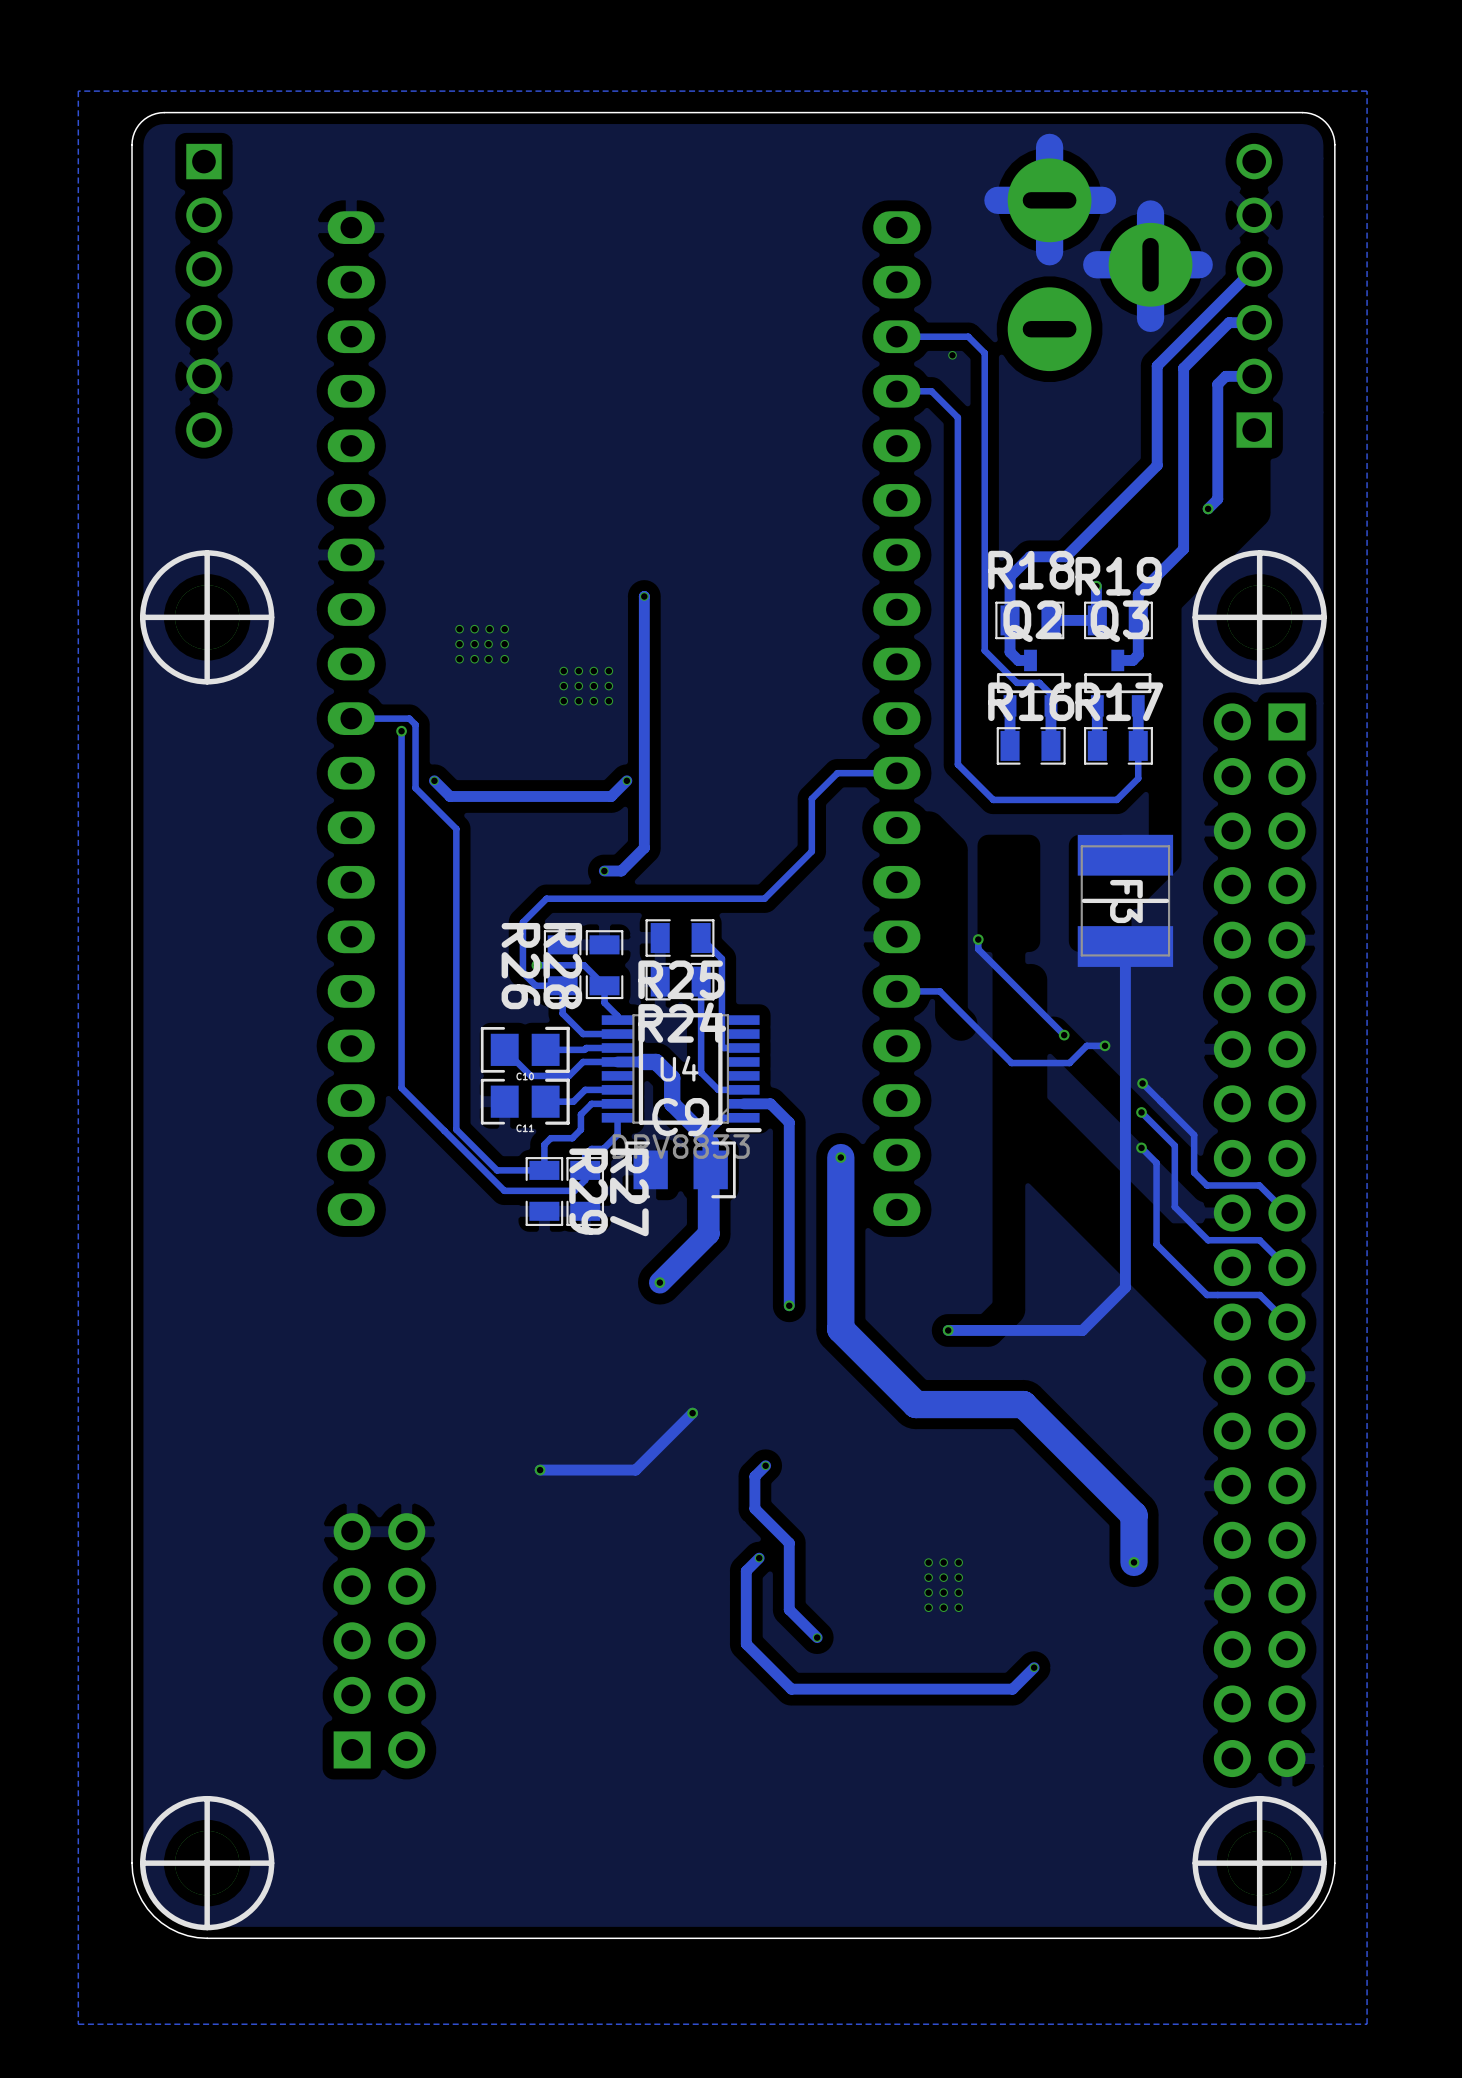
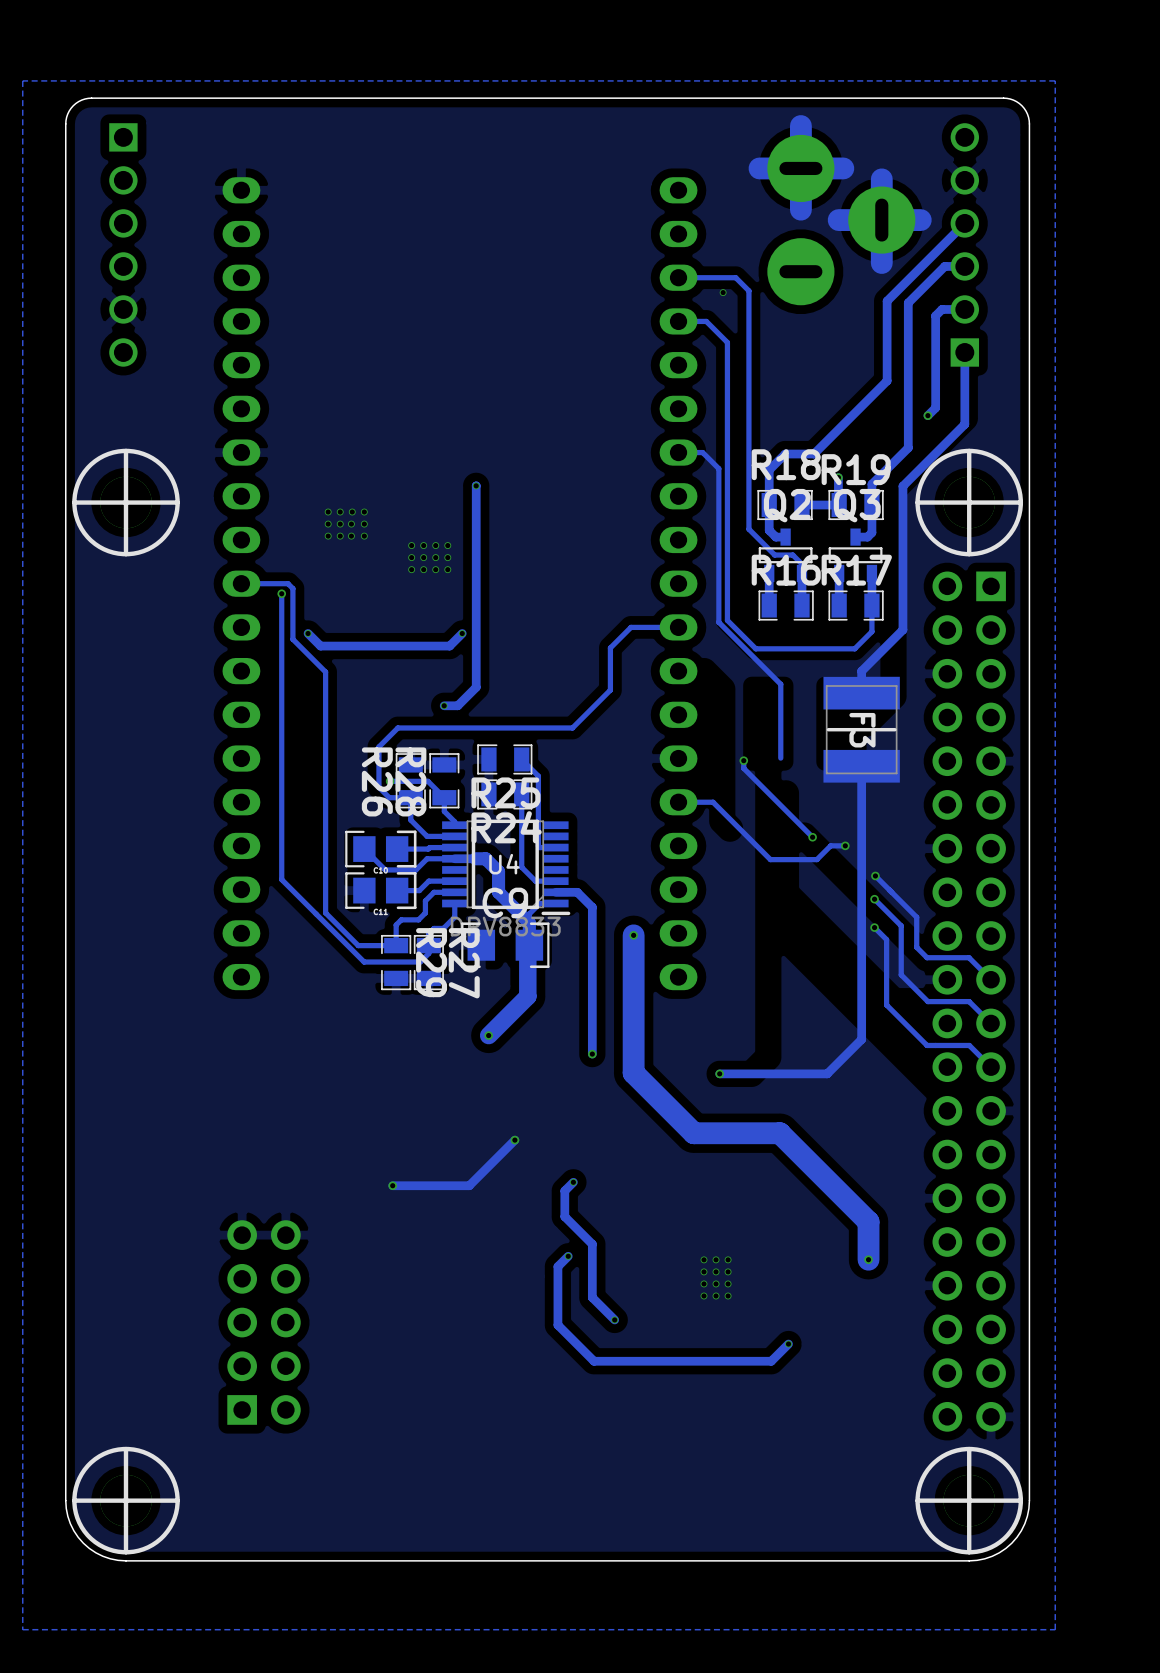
track: none -> (964, 352) (964, 424) (902, 486) (902, 629) (861, 671) (861, 693)
track: none -> (678, 452) (702, 452) (718, 468) (718, 622) (780, 684) (780, 758)

